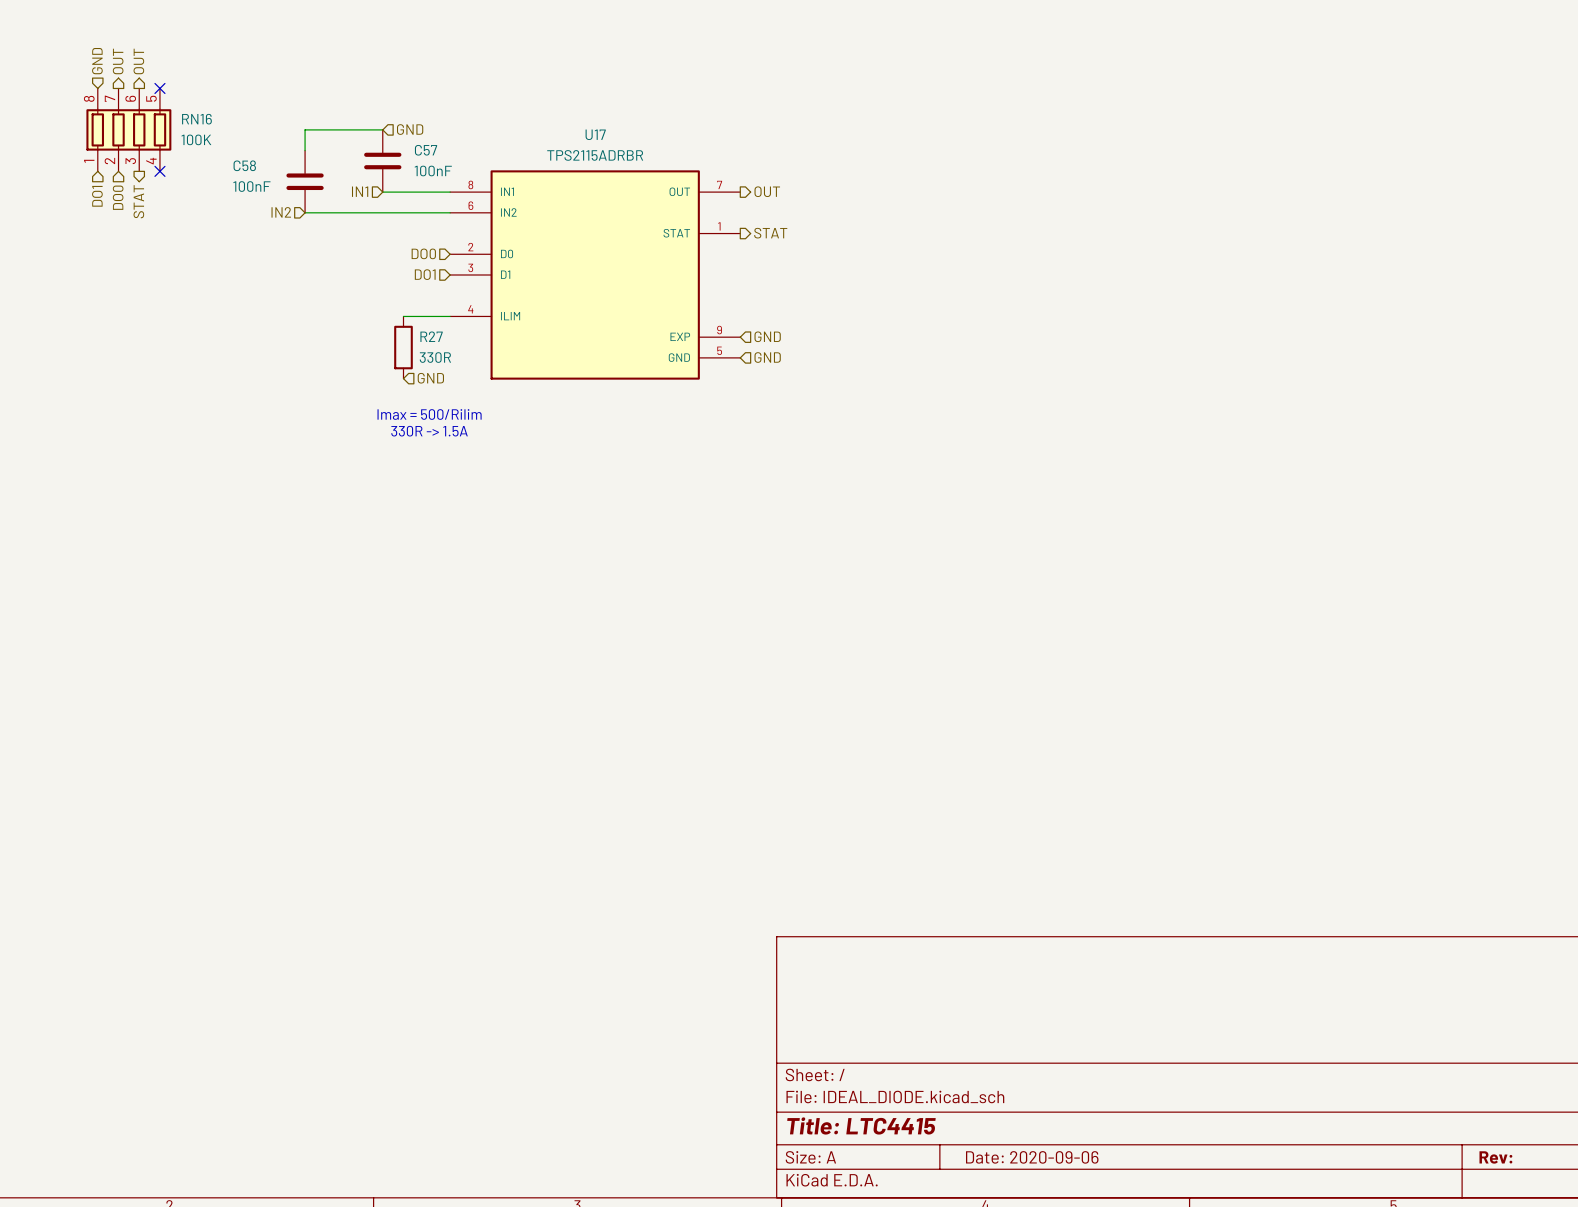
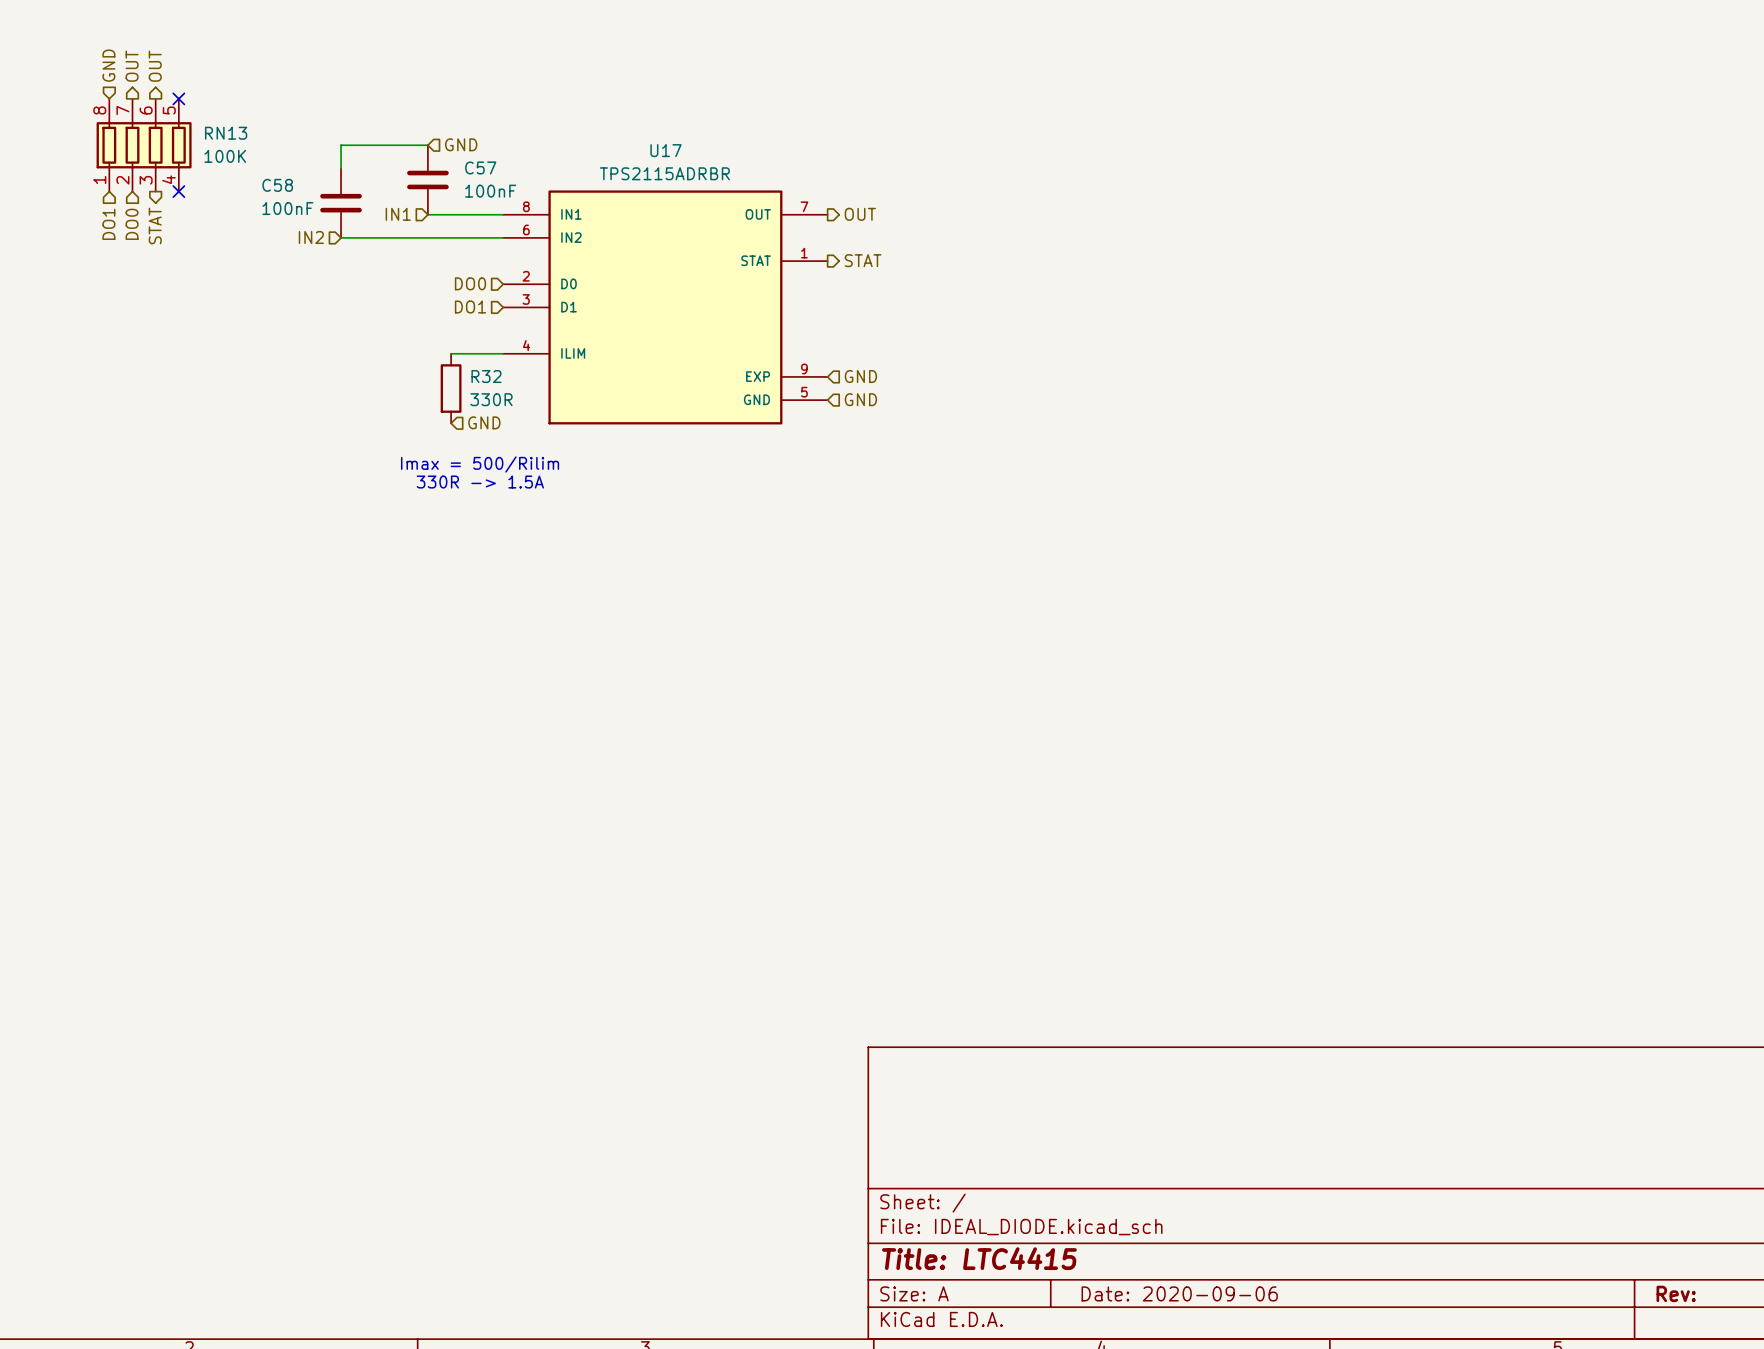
RN16 name: RN16 (196, 119) -> RN13 (226, 133)
R27 name: R27 (431, 336) -> R32 (486, 376)

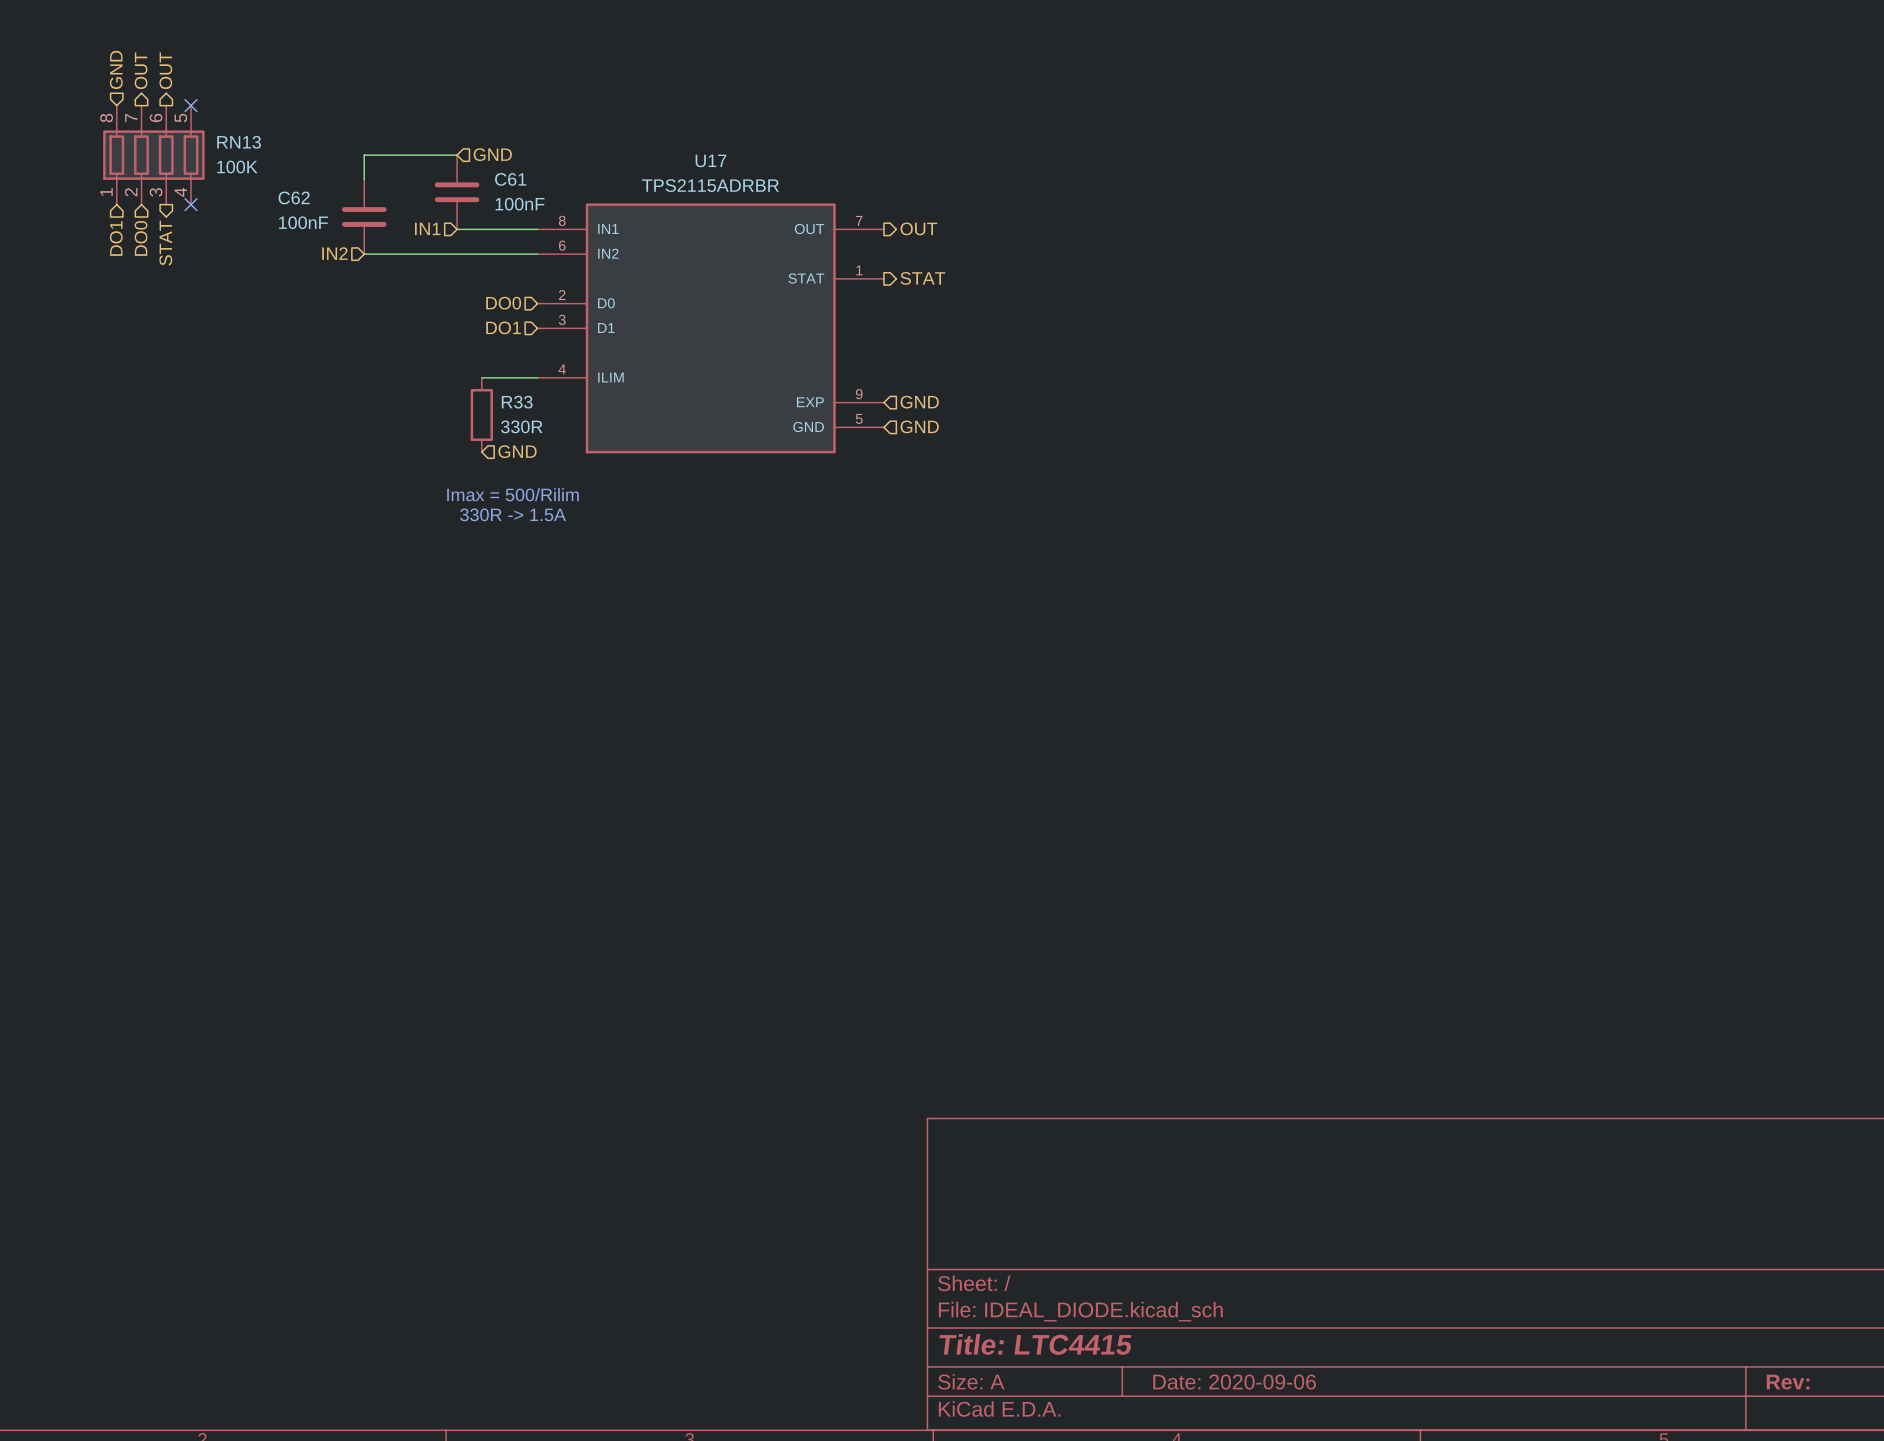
C57 name: C57 (480, 167) -> C61 (510, 179)
C58 name: C58 (277, 185) -> C62 (294, 197)
R32 name: R32 (486, 376) -> R33 (517, 402)

